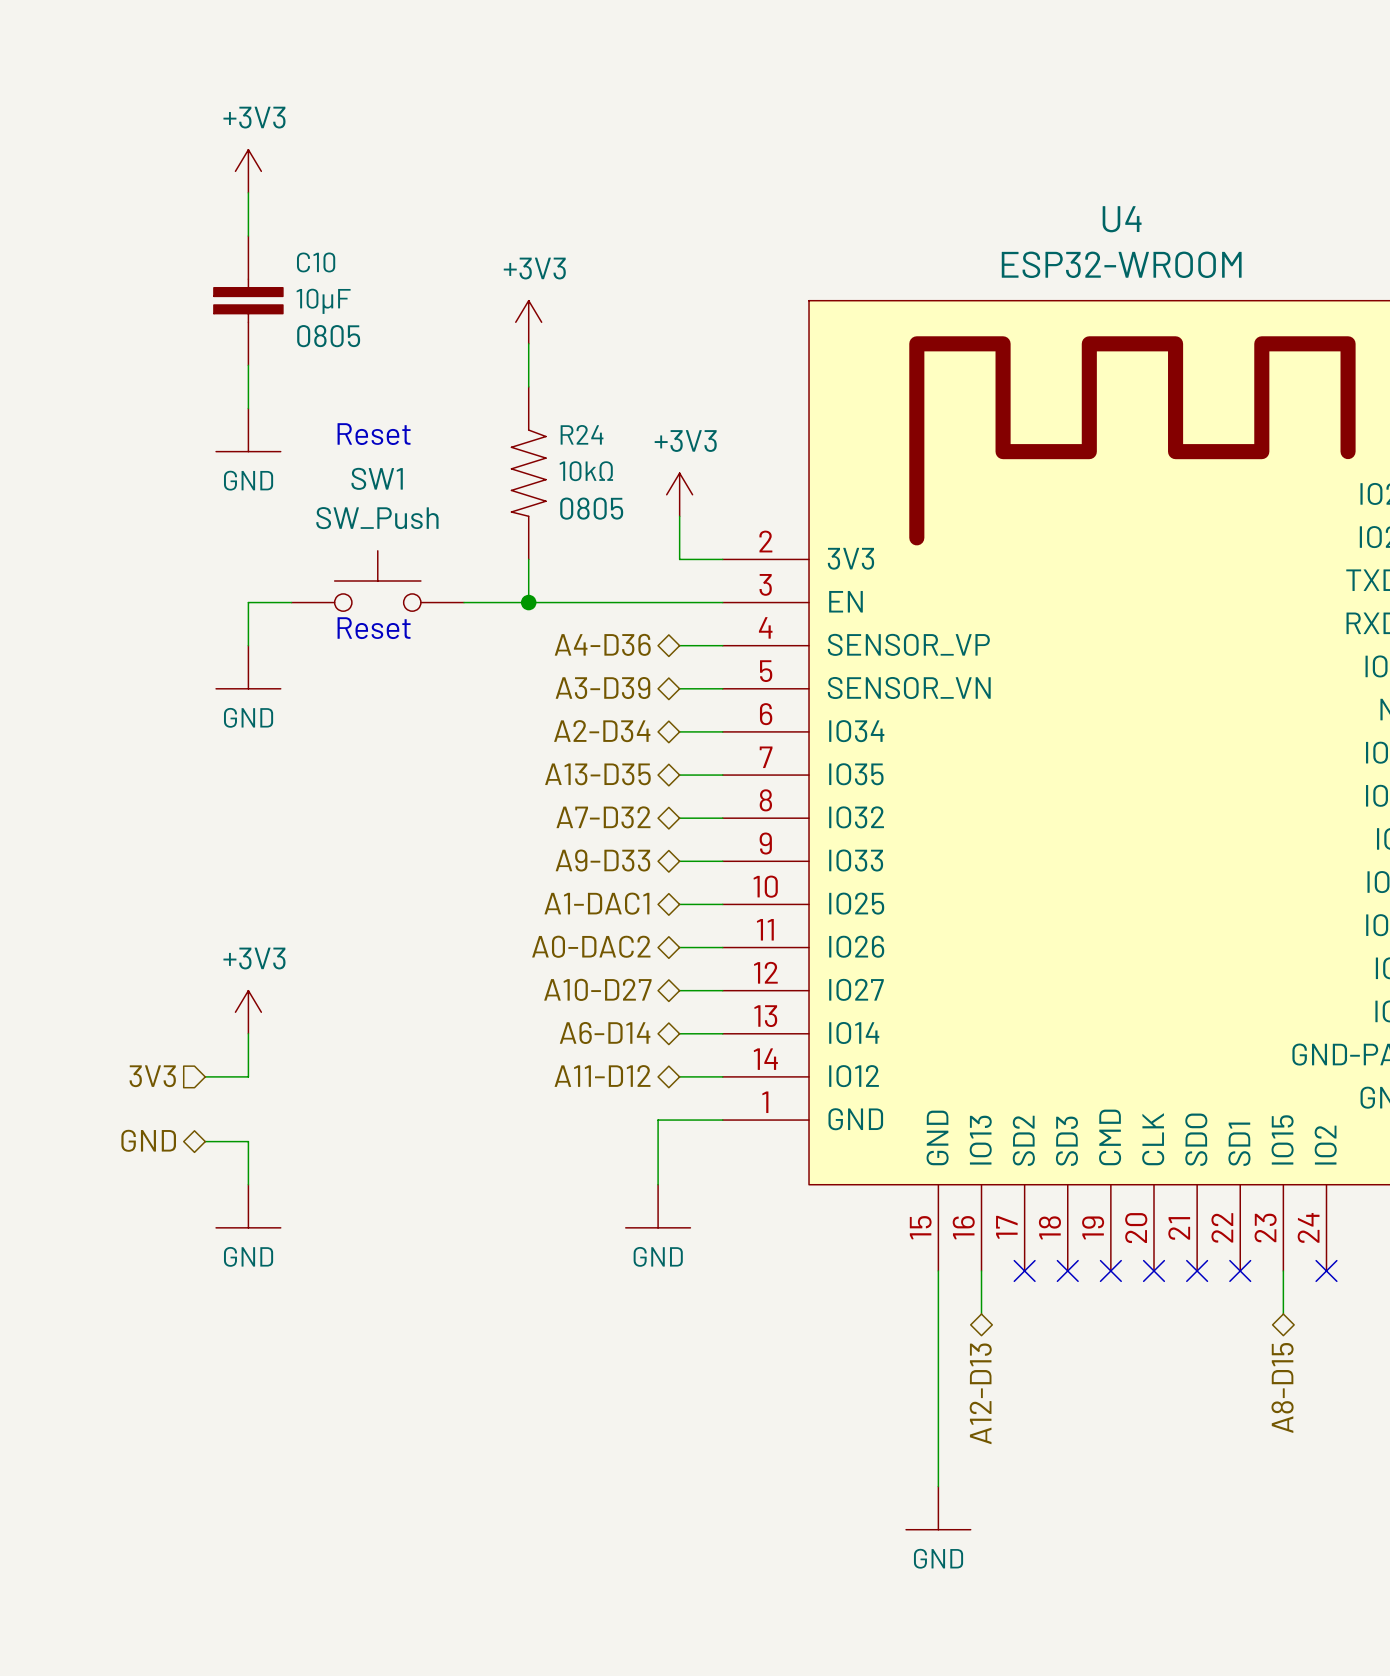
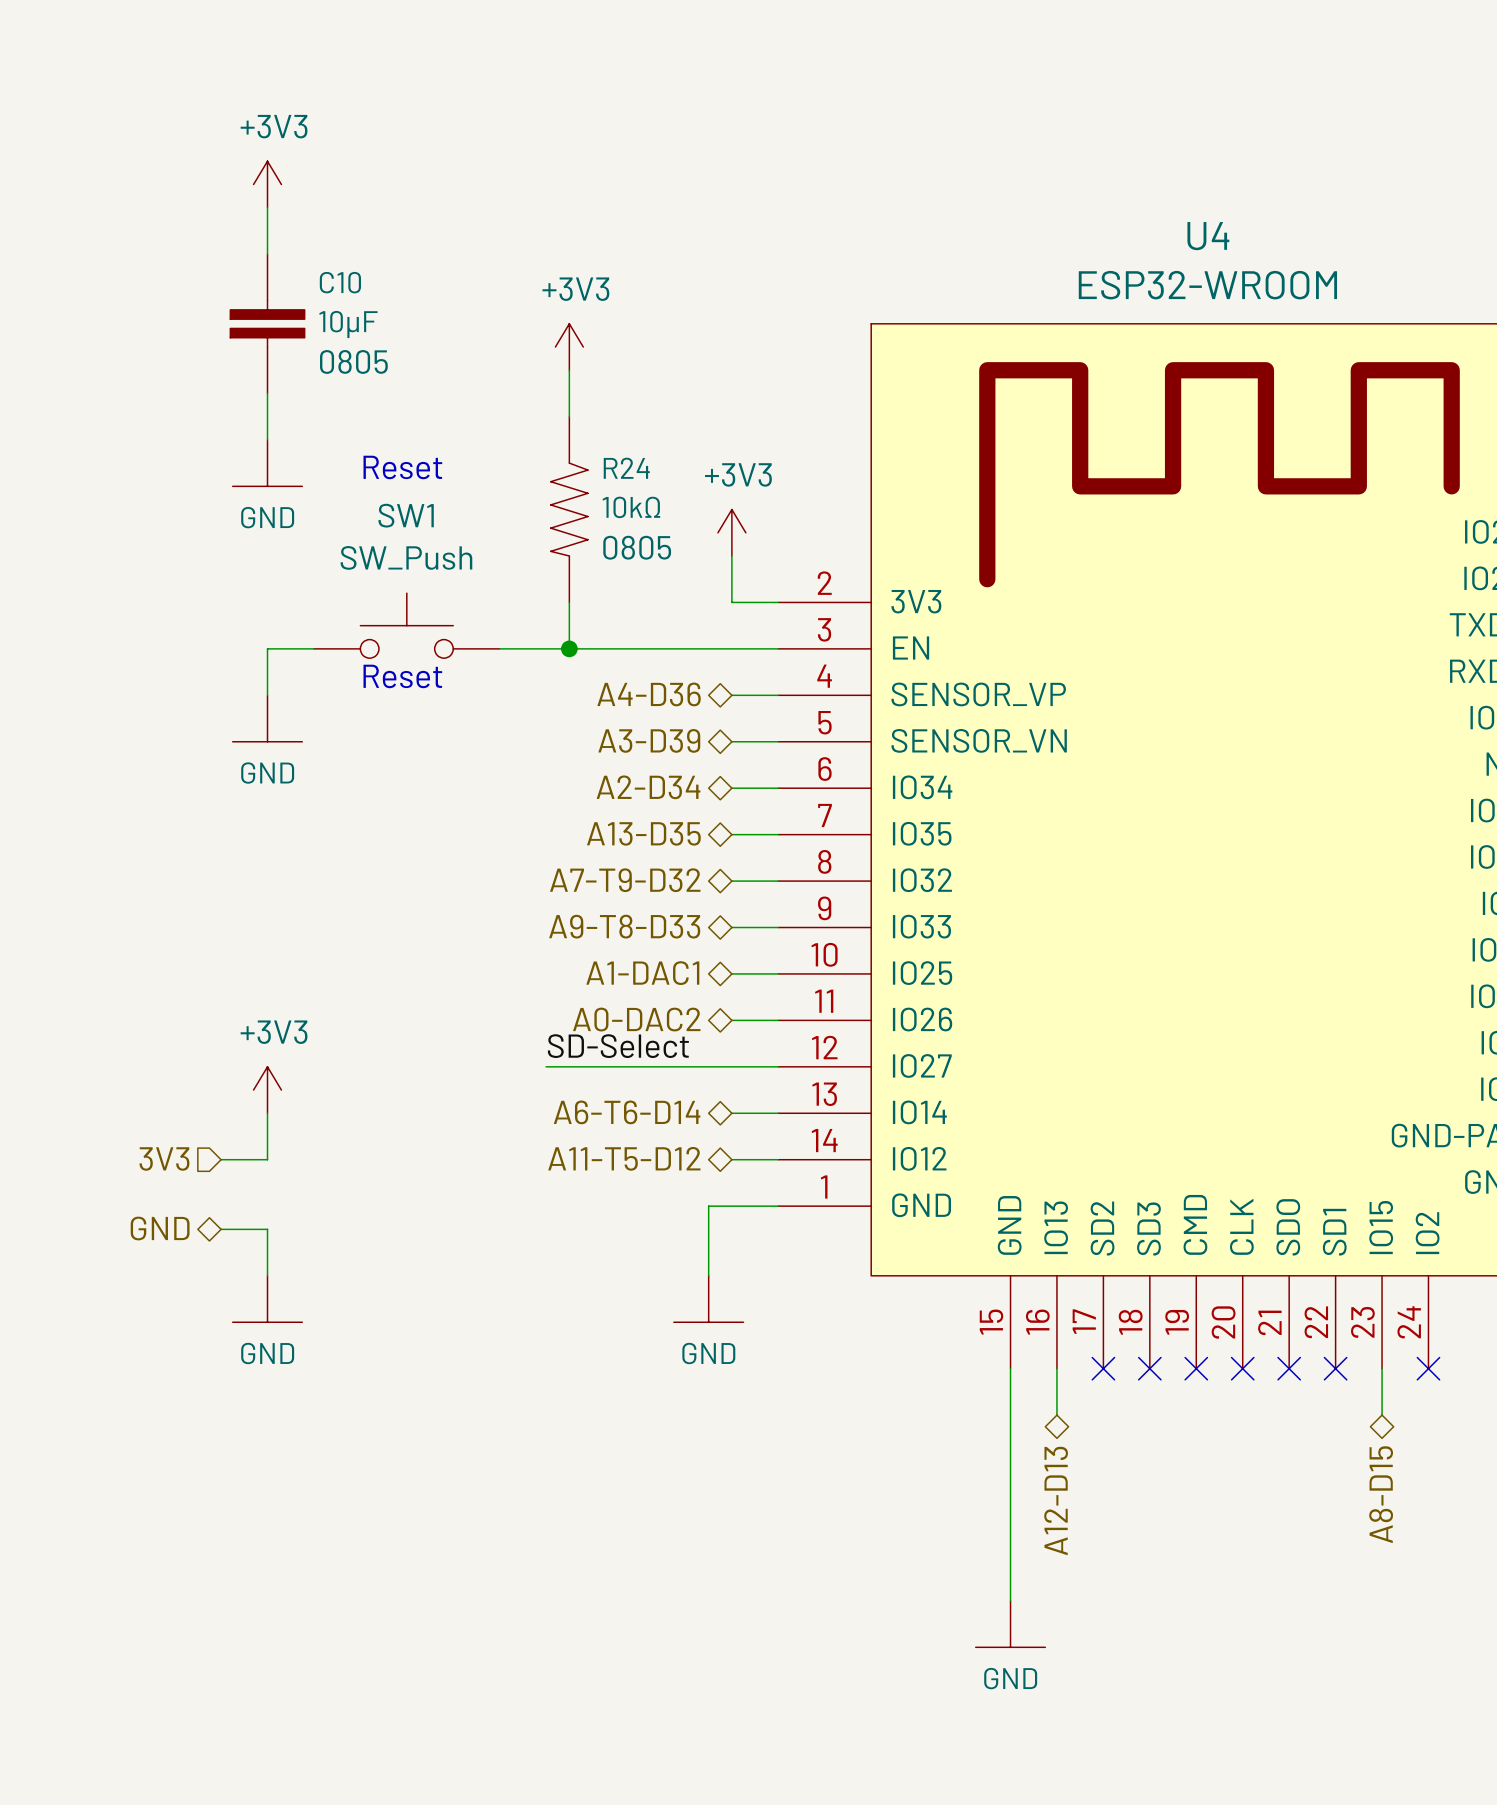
hierarchical label: A7-D32 (603, 817) -> A7-T9-D32 (625, 880)
hierarchical label: A9-D33 (602, 860) -> A9-T8-D33 (624, 926)
label: none -> SD-Select (618, 1046)
hierarchical label: A10-D27 (597, 989) -> none
wire: none -> (546, 1066) (731, 1066)
hierarchical label: A6-D14 (605, 1032) -> A6-T6-D14 (627, 1112)
hierarchical label: A11-D12 (602, 1075) -> A11-T5-D12 (624, 1158)

